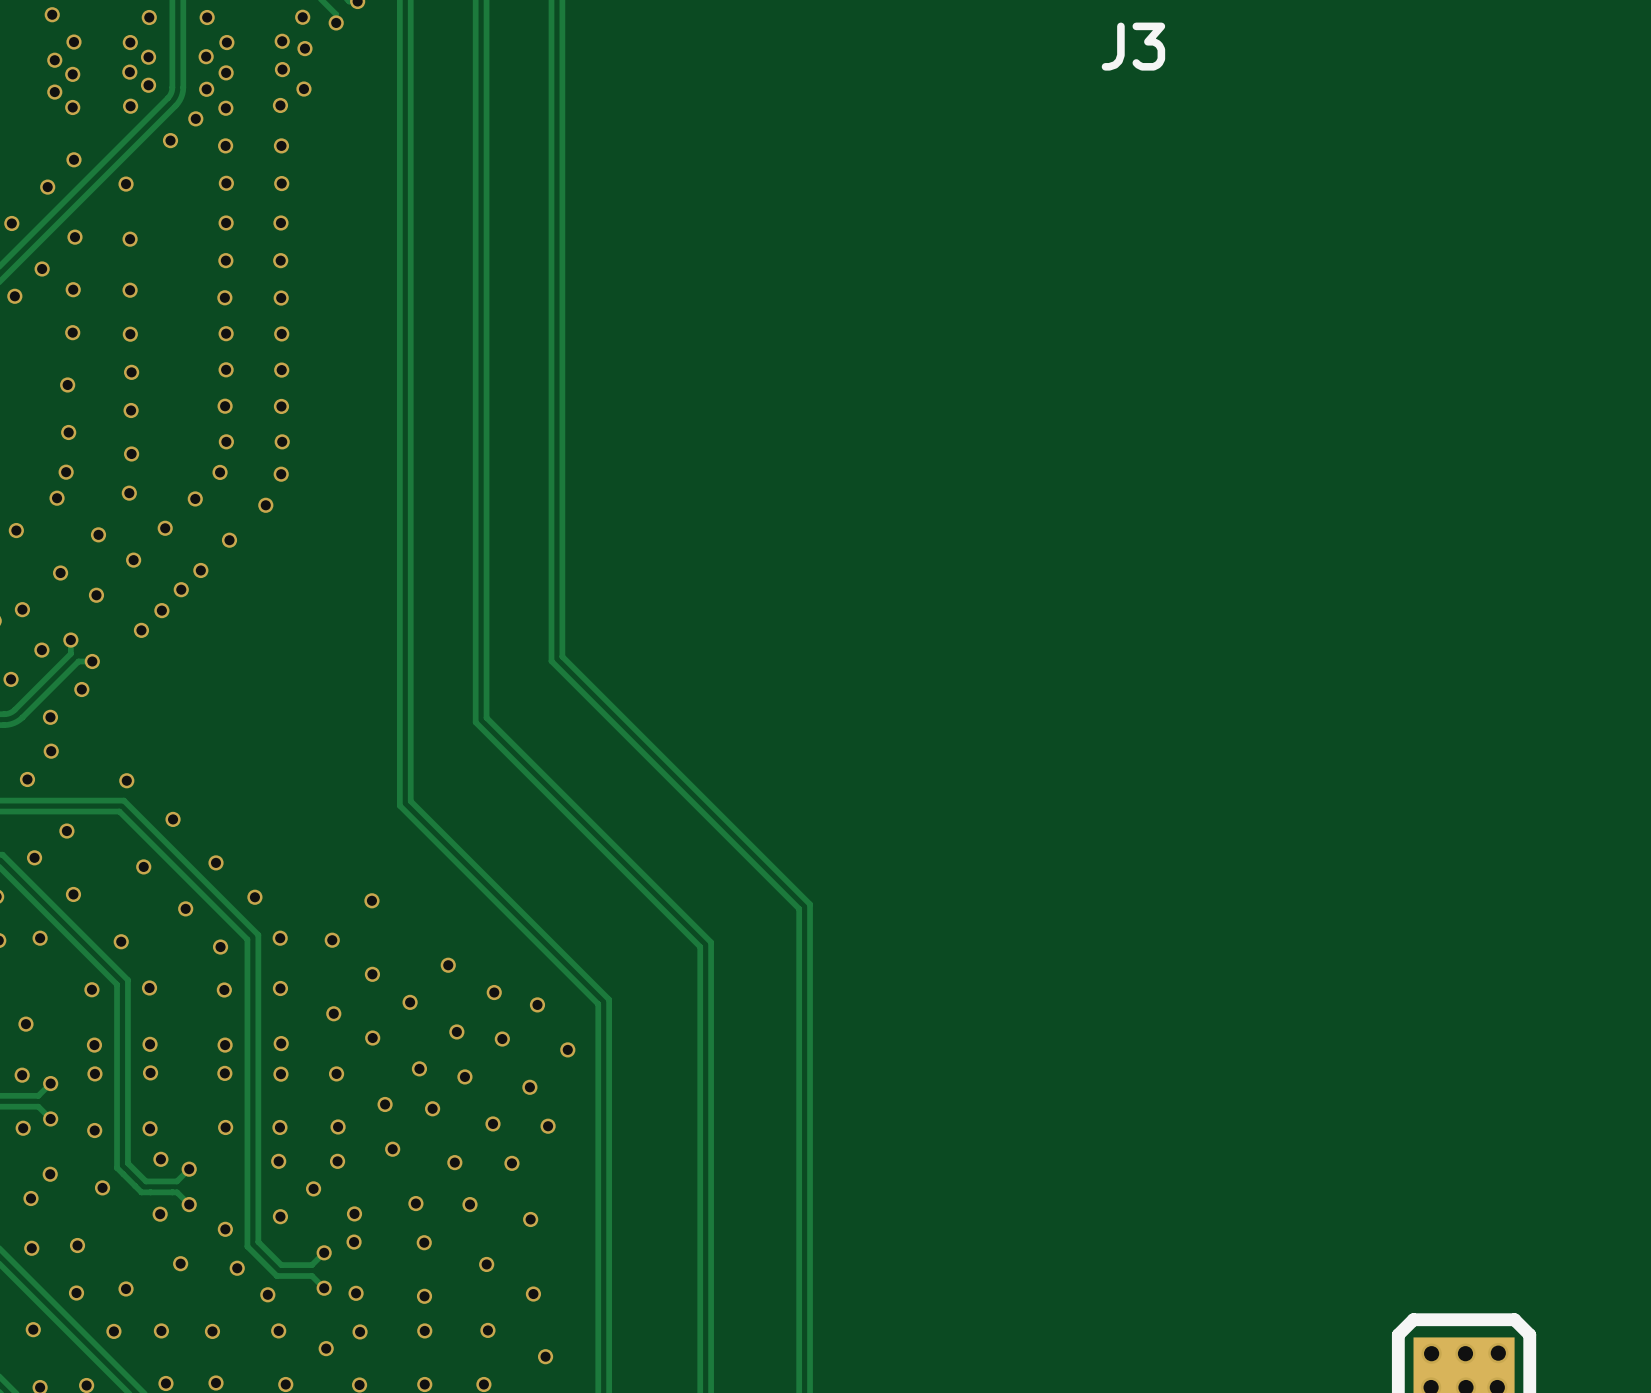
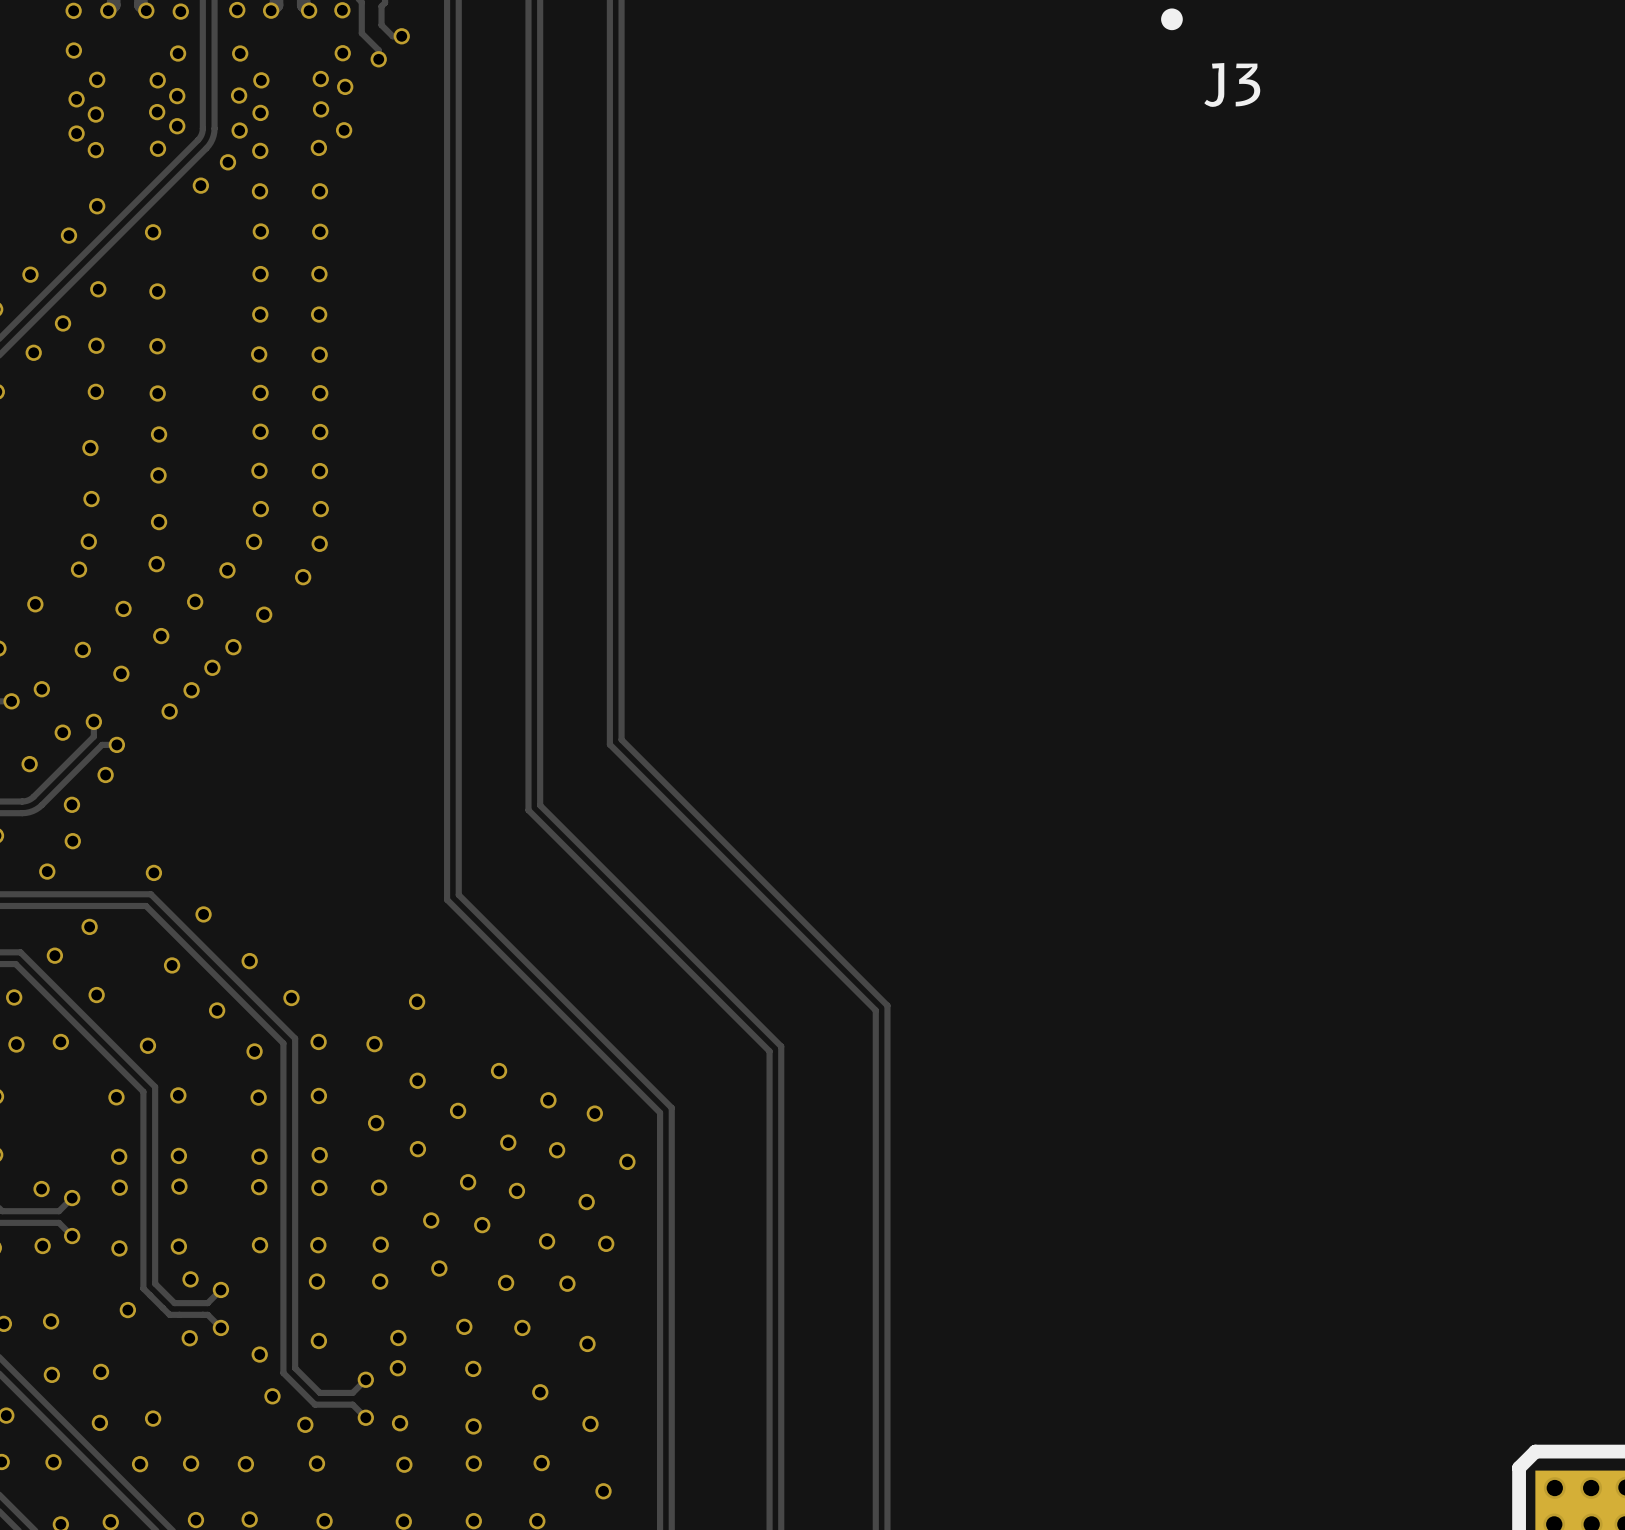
via: (25, 1024) -> none
via: (50, 1174) -> none
via: (313, 1188) -> none
via: (180, 1263) -> none
via: (326, 1348) -> none

